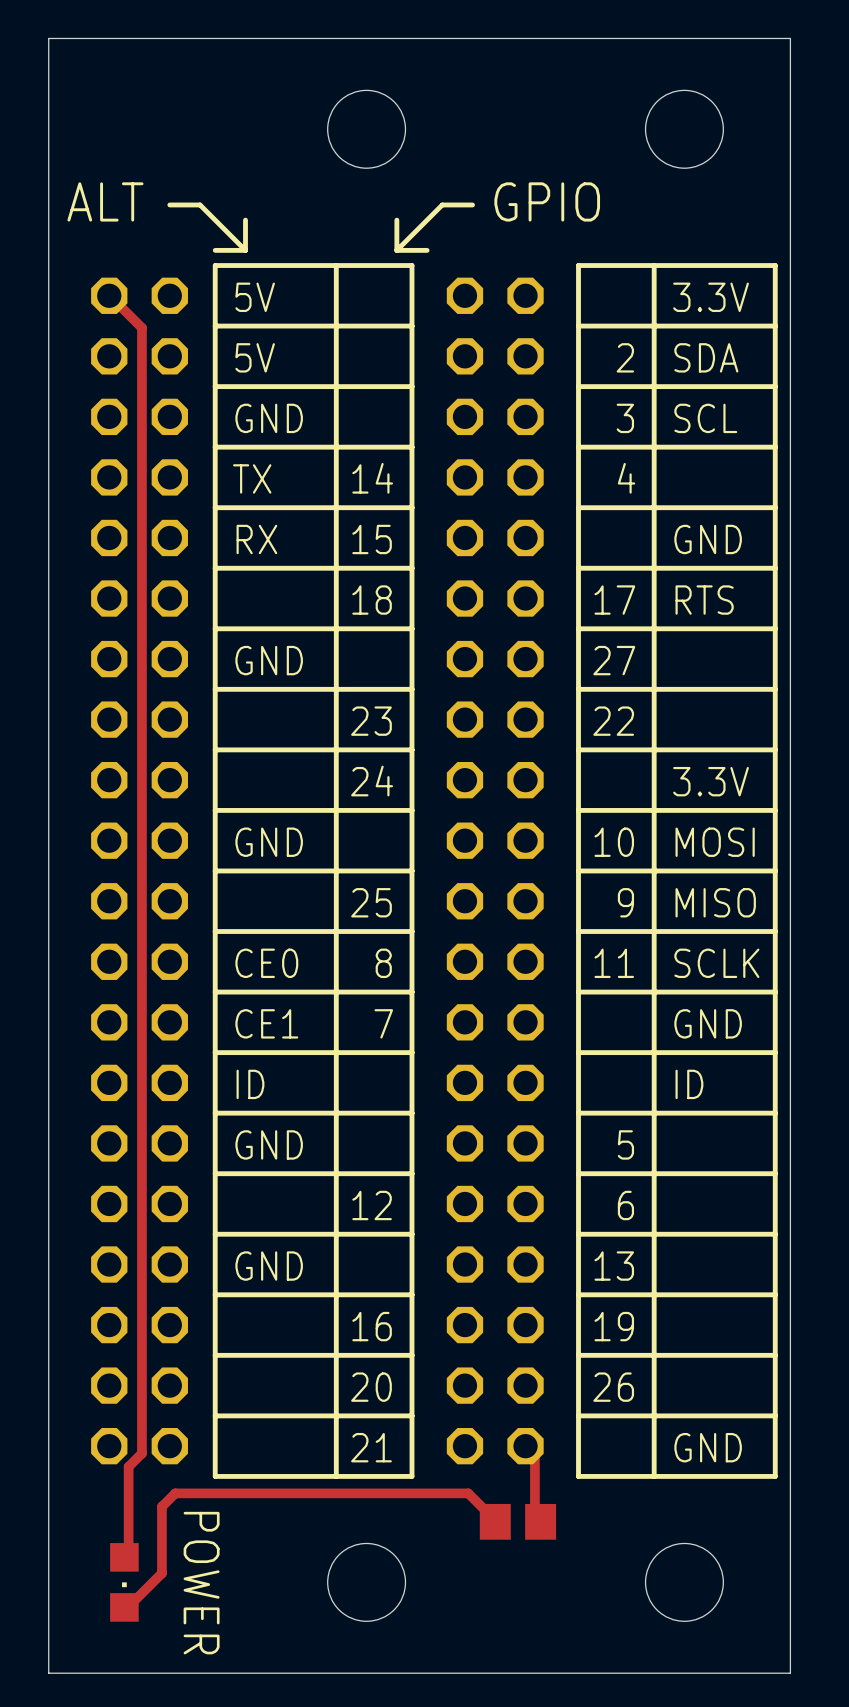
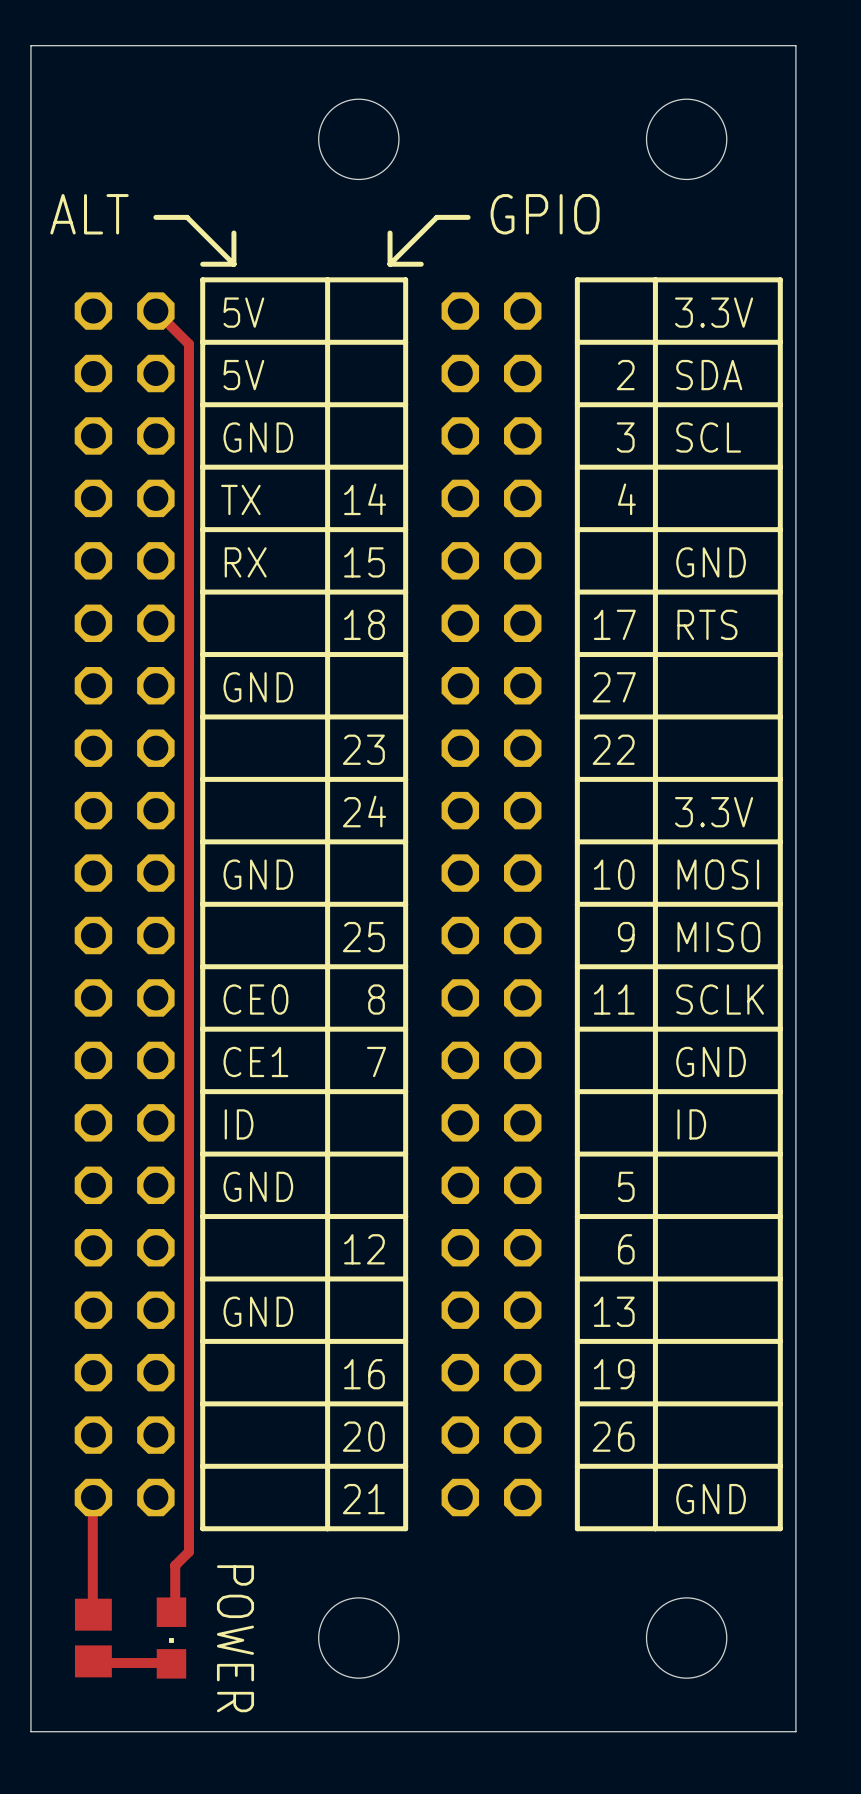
track: (109, 295) (141, 327) (141, 1453) (128, 1466) (128, 1553) (124, 1557) -> none
track: none -> (155, 311) (188, 344) (188, 1551) (175, 1565) (175, 1608) (171, 1612)
track: none -> (93, 1497) (93, 1614)
track: (525, 1446) (534, 1453) (534, 1520) (540, 1521) -> none
track: (495, 1521) (468, 1493) (175, 1493) (161, 1506) (161, 1573) (128, 1606) (124, 1607) -> none
part: (517, 1521) -> none
part footprint: [110, 1543, 139, 1622] -> [74, 1598, 112, 1678]
part: none -> (171, 1638)
text position: POWER (201, 1583) -> POWER (235, 1638)
track: none -> (93, 1661) (171, 1663)

